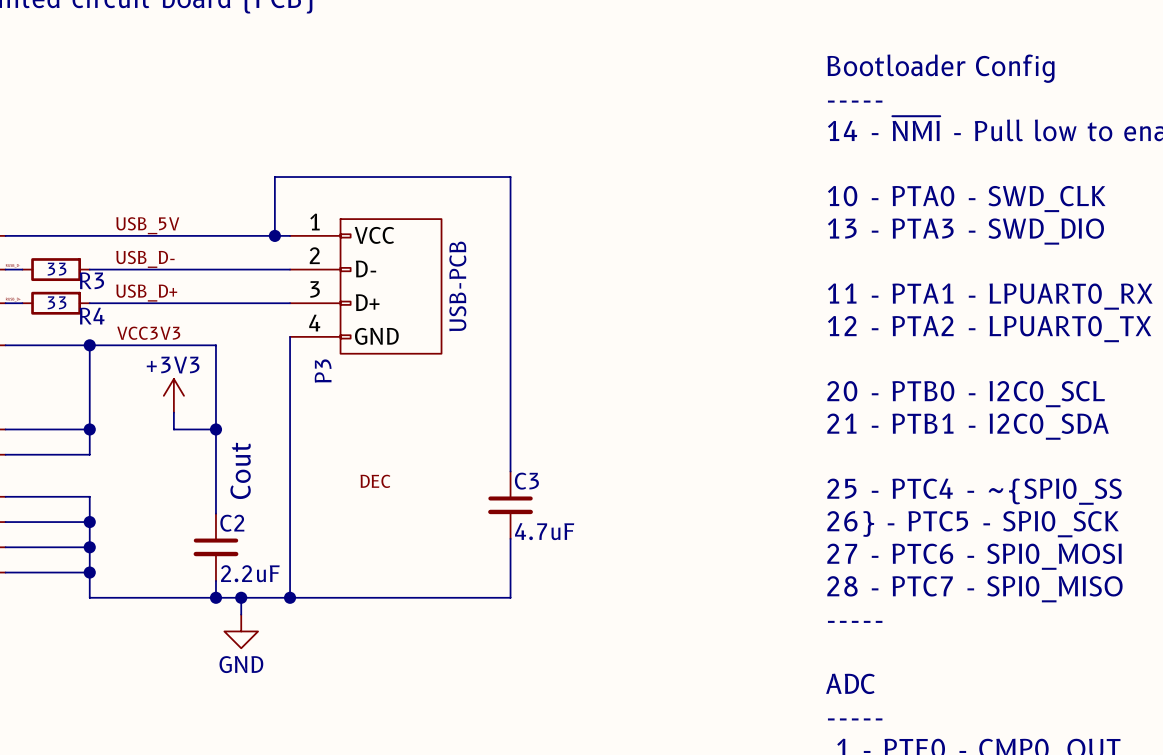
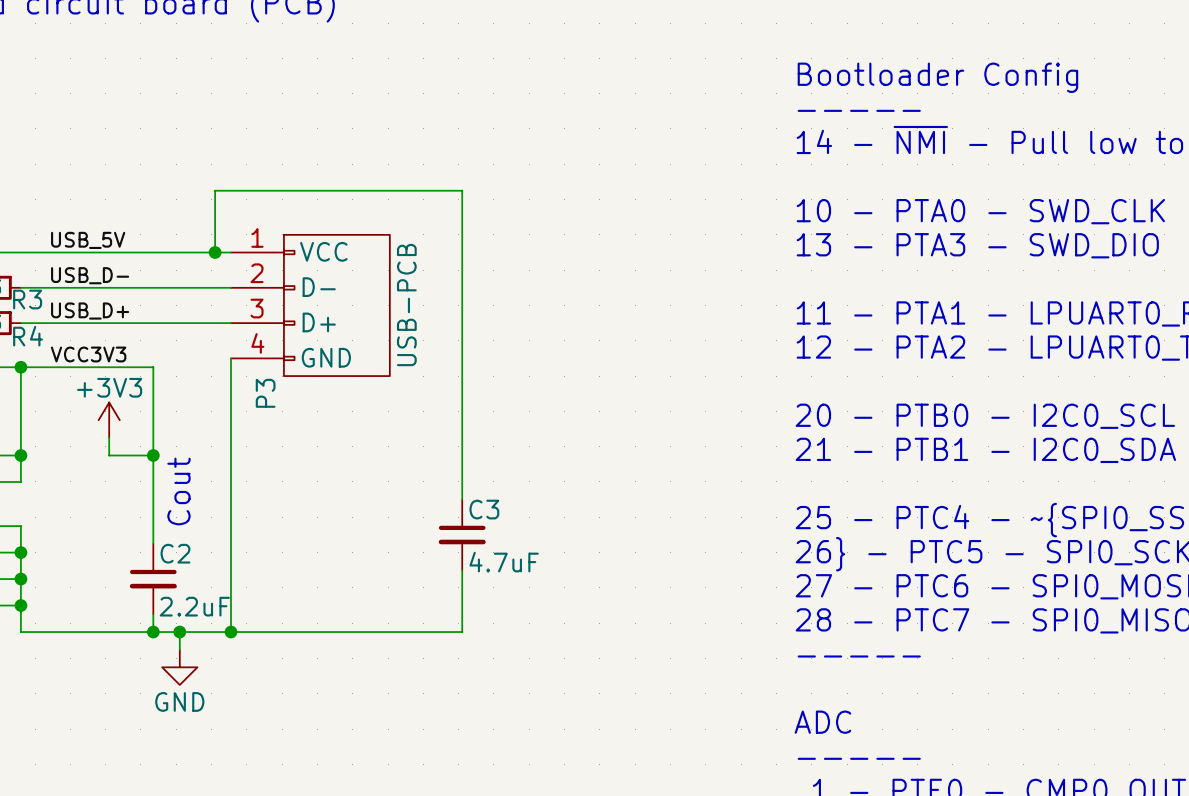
label: DEC (375, 481) -> none

